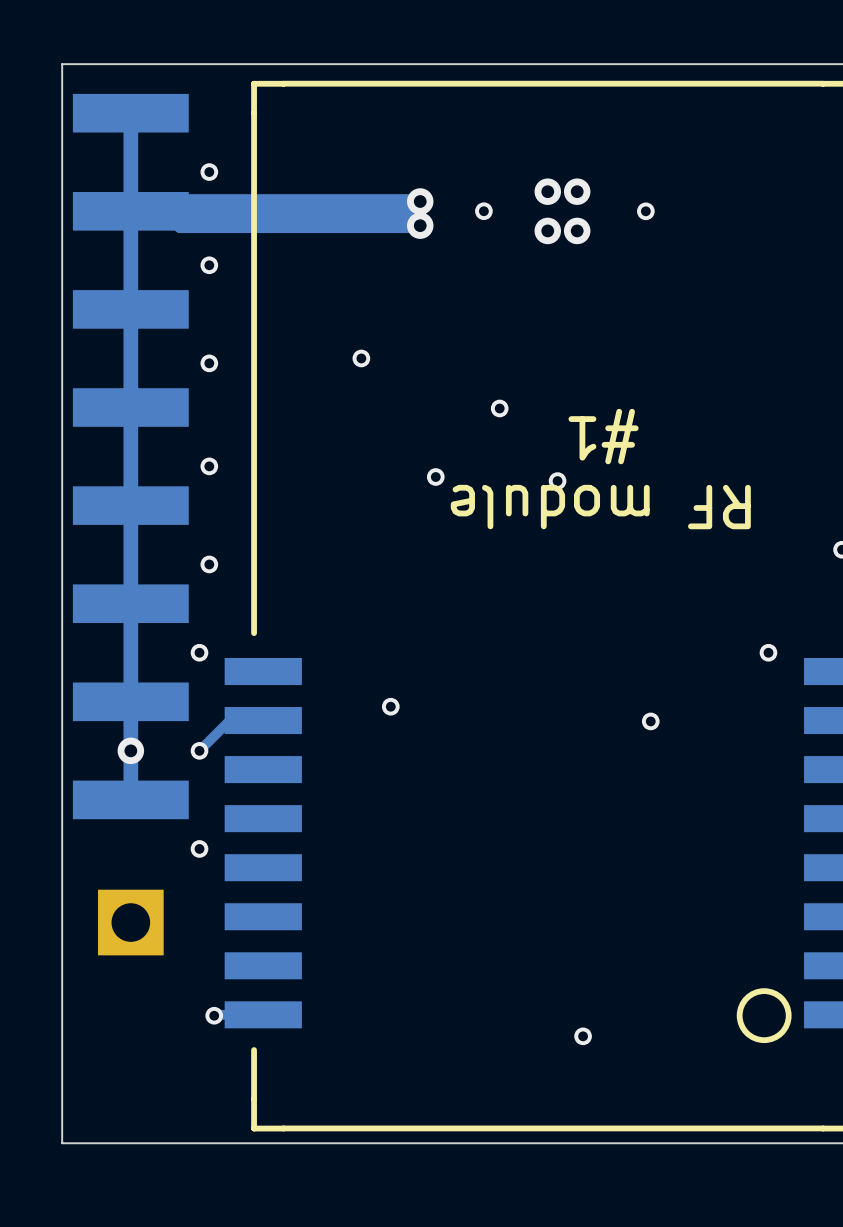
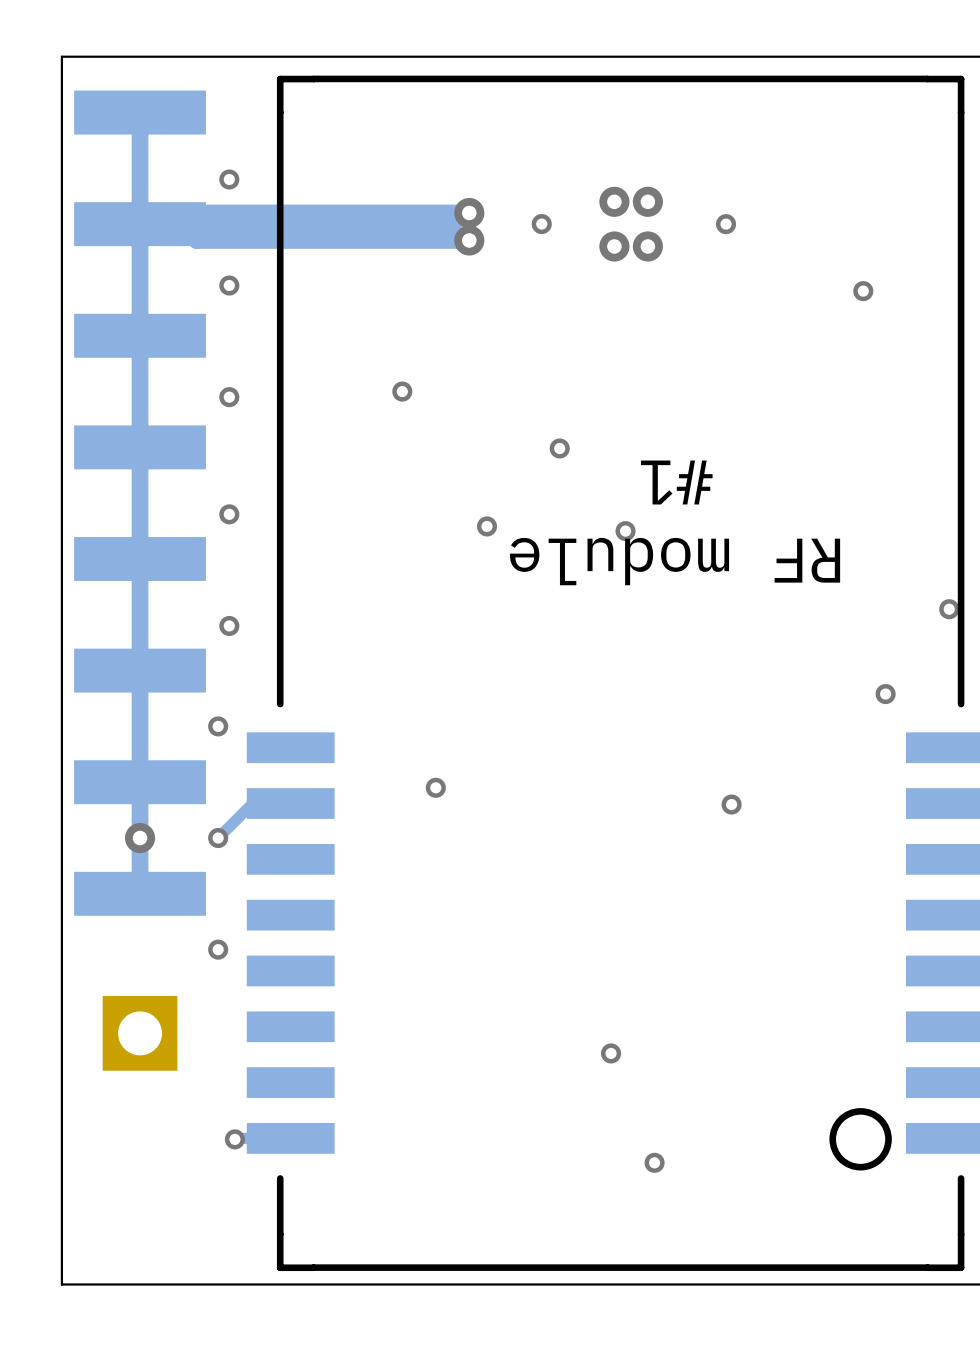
via: none -> (863, 291)
via position: (768, 652) -> (885, 694)
via: none -> (611, 1053)

